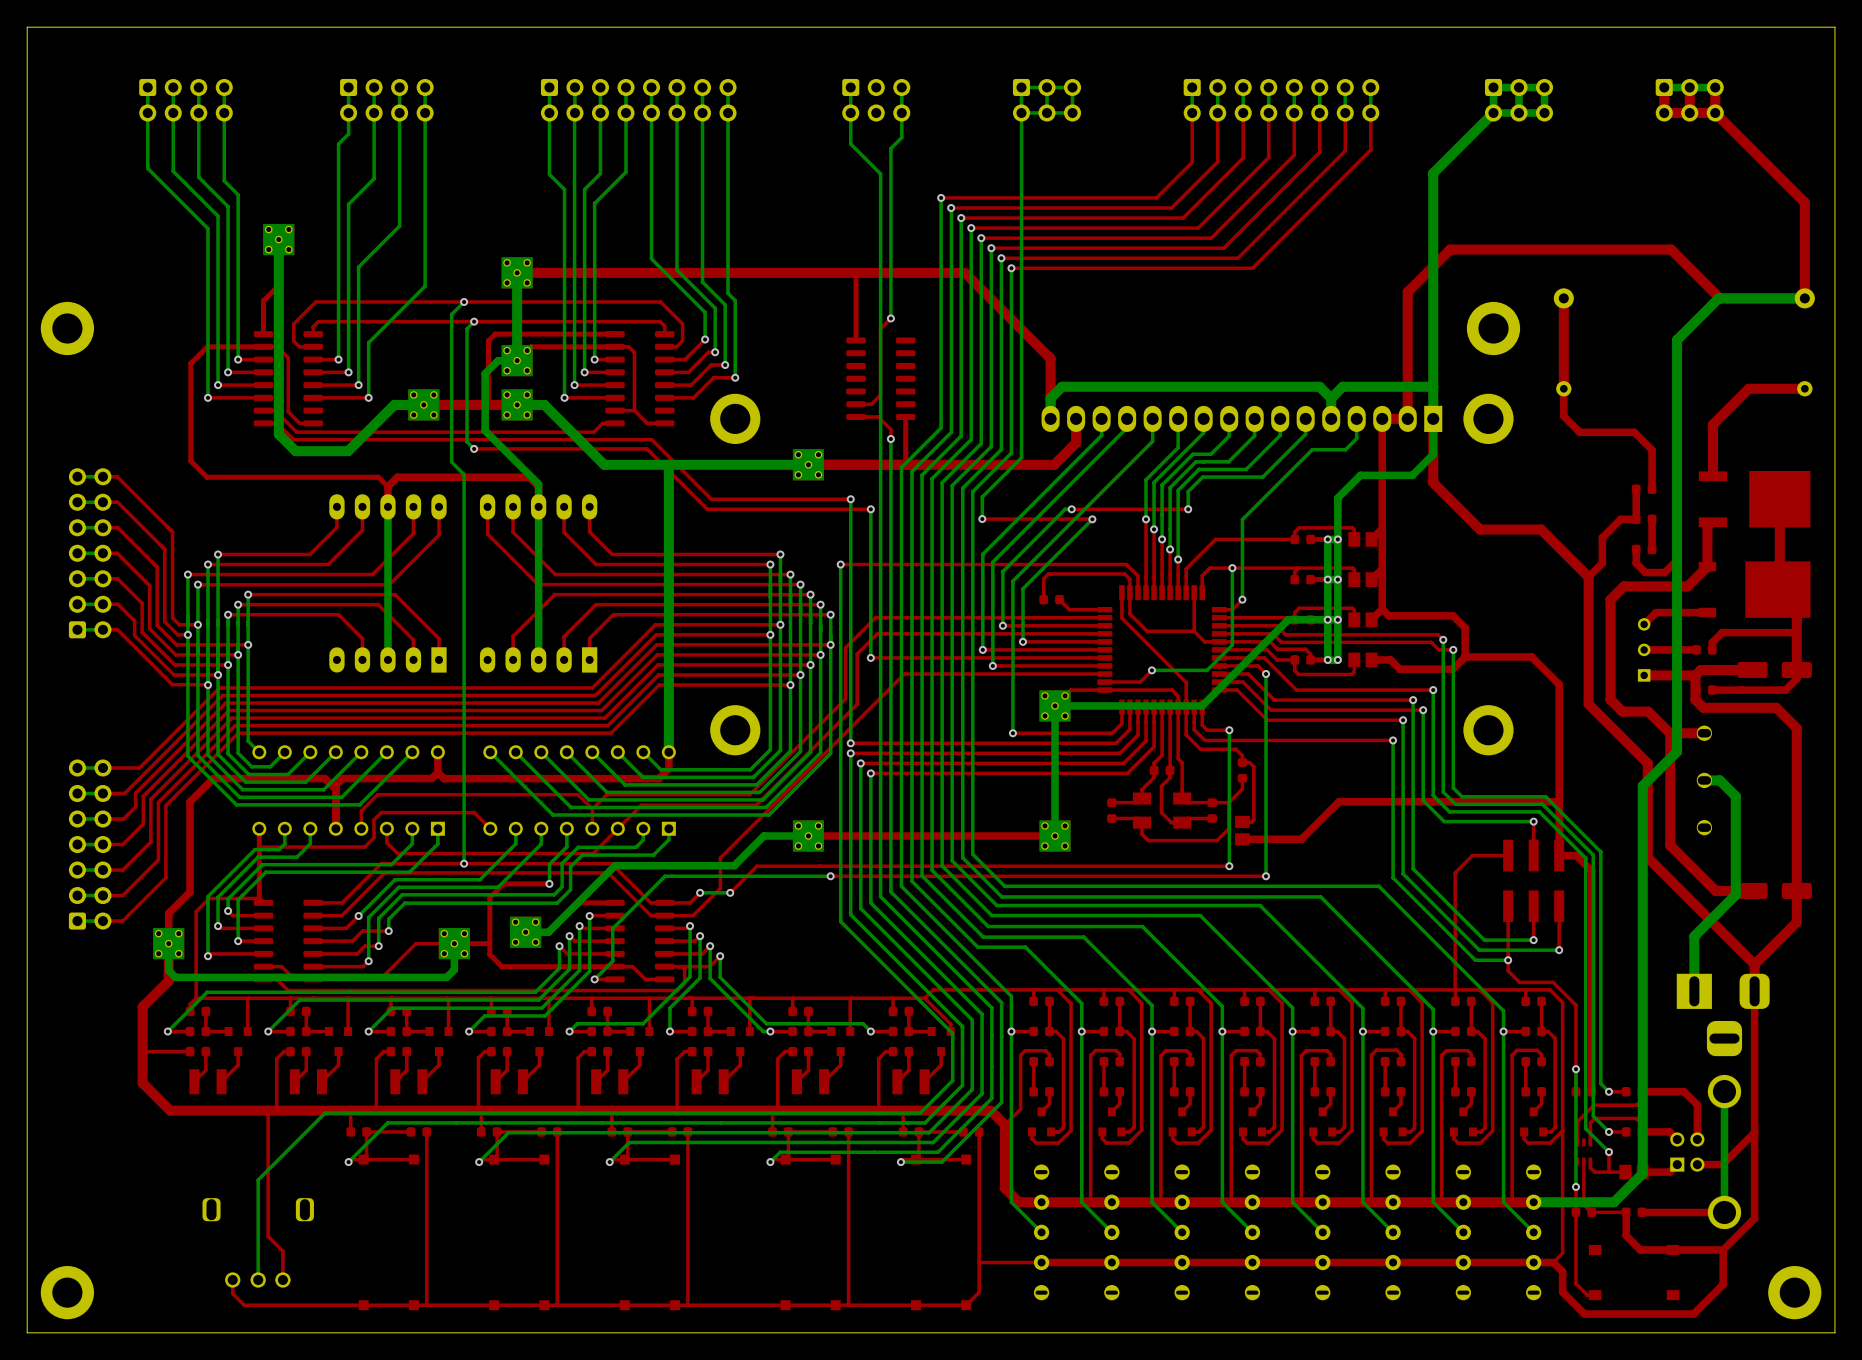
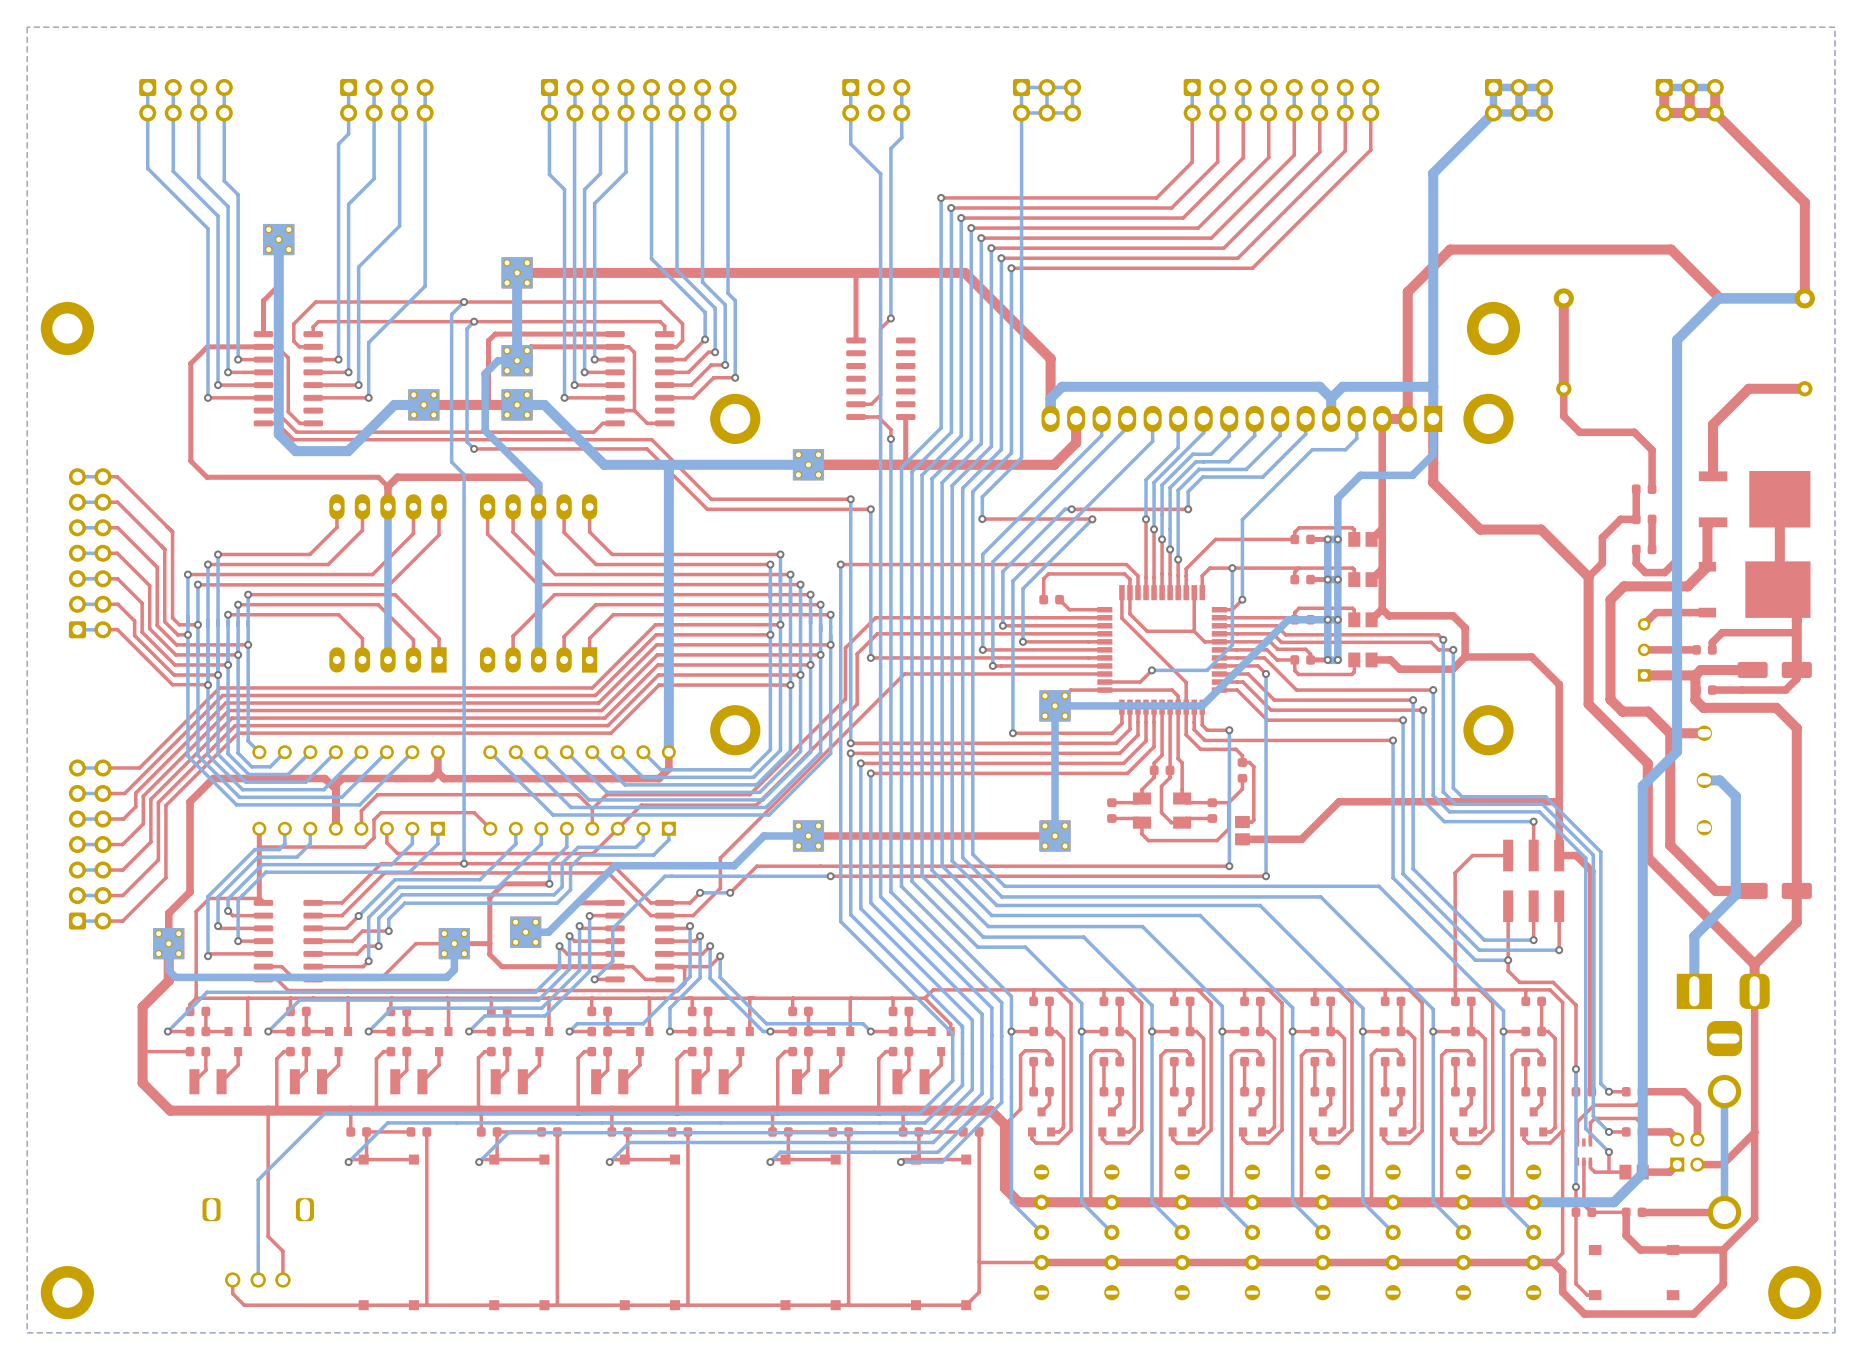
board edge: (1834, 27) (1834, 1332) (27, 1332) (27, 27) (1834, 27) -> none
bottom zone outline: none -> (1834, 27) (1834, 1332) (27, 1332) (27, 27) (1834, 27)

